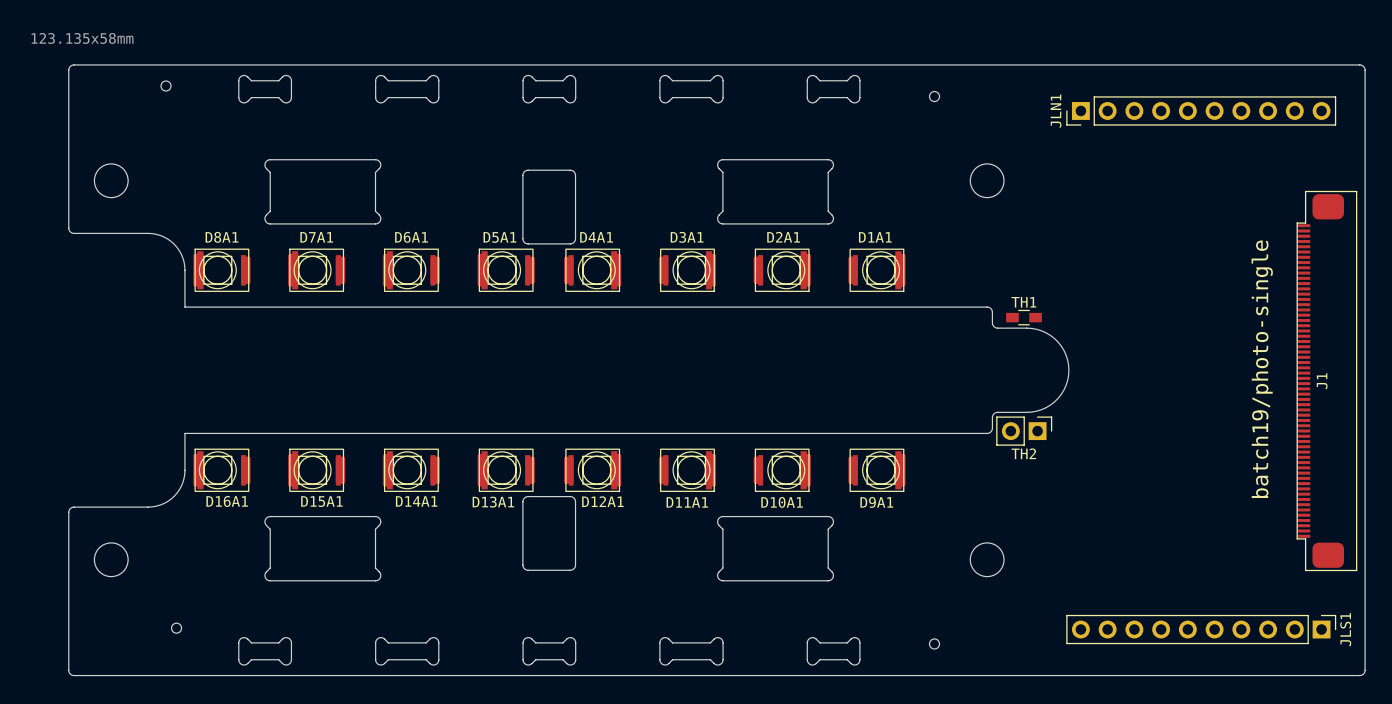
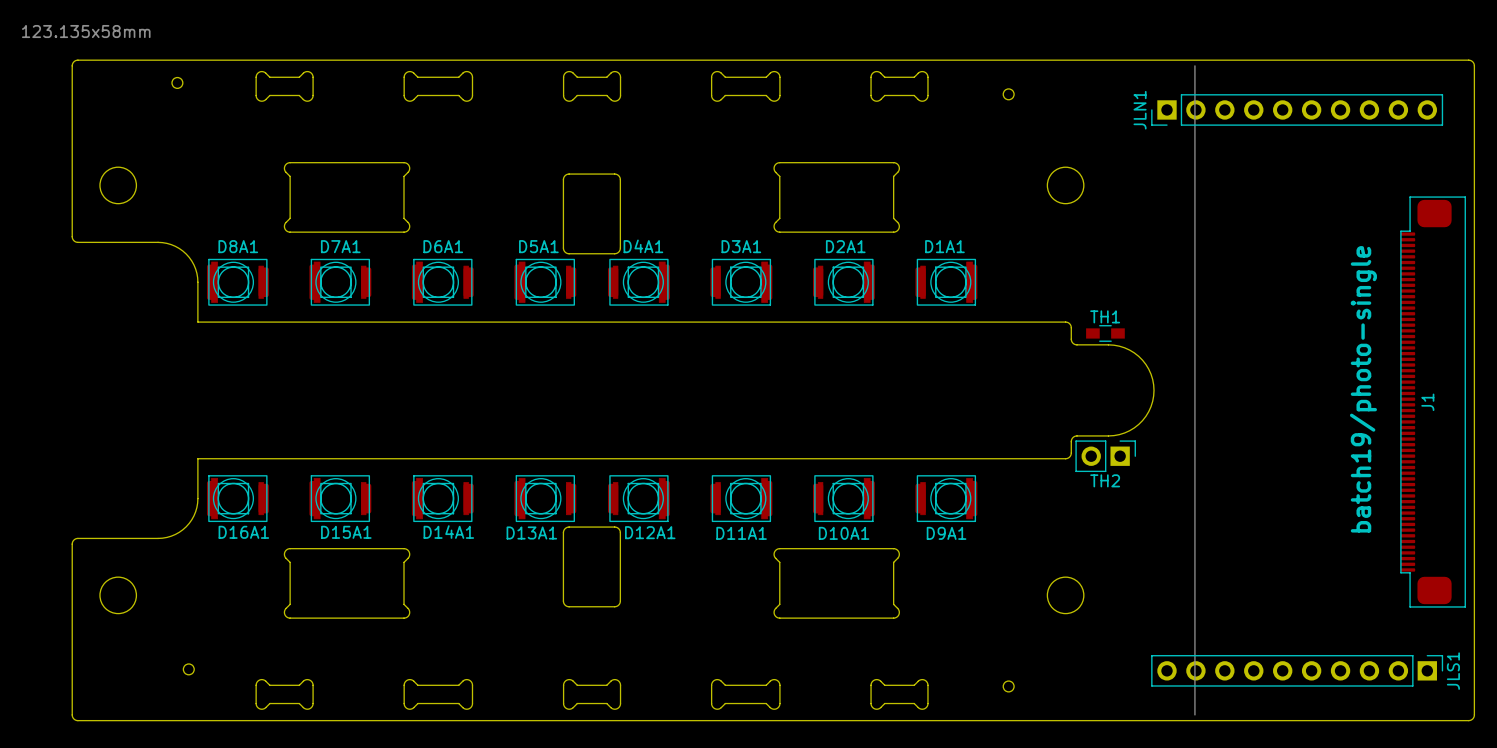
line: none -> (1194, 65) (1194, 714)

